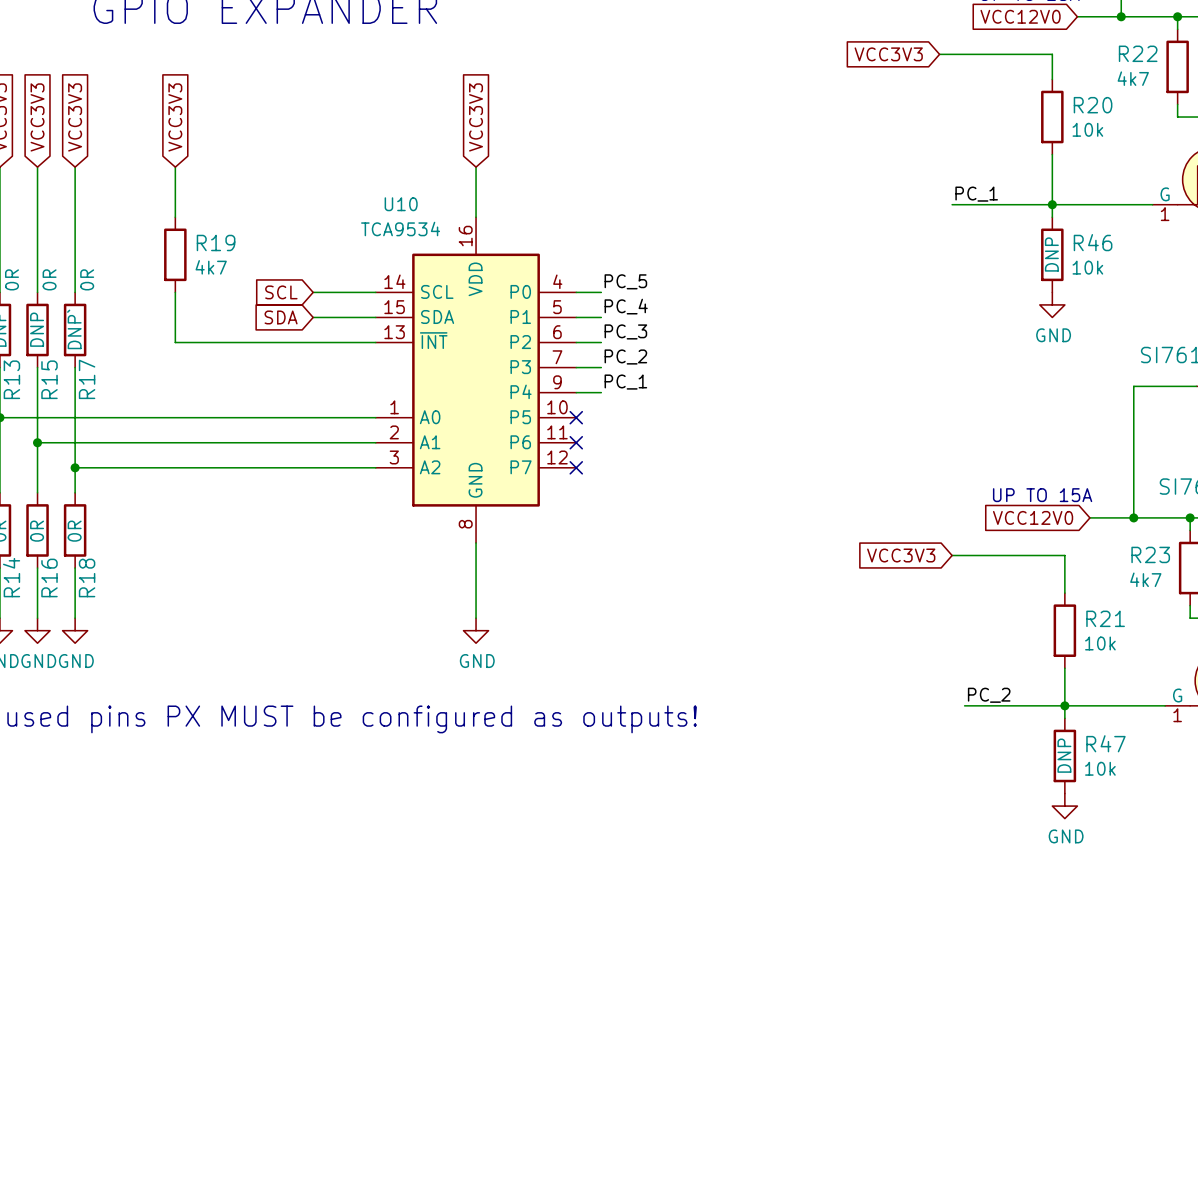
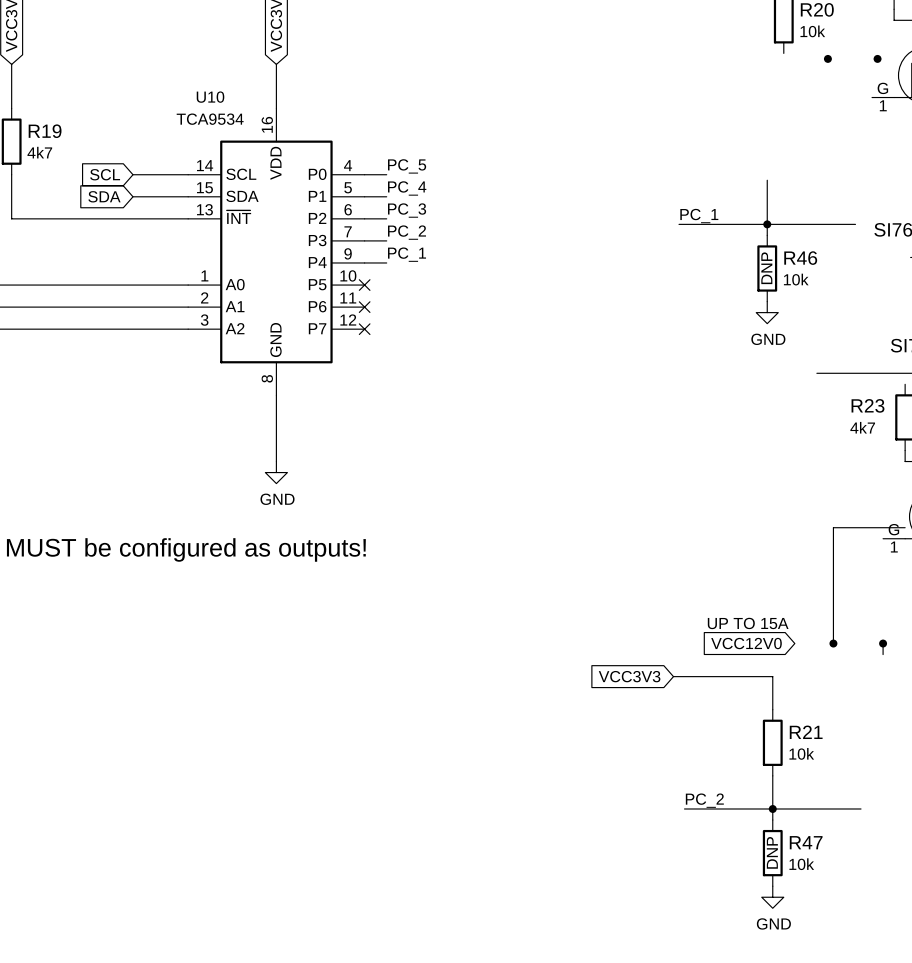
wire: (1052, 154) (1052, 217) -> (767, 180) (767, 235)
junction: none -> (827, 58)
junction: none -> (877, 58)
label position: PC_1 (976, 194) -> PC_1 (699, 216)
wire: (952, 204) (1152, 204) -> (679, 224) (855, 224)
junction: (1052, 204) -> none
R46 position: (1052, 254) -> (767, 268)
power symbol: GND (1052, 304) -> none
junction: none -> (767, 224)
wire: (1196, 386) (1133, 386) (1133, 517) -> none
power symbol: none -> GND (767, 312)
text: UP TO 15A (1042, 495) -> none
global label: VCC12V0 (1033, 517) -> none
junction: (1133, 517) -> none
wire: (1190, 517) (1190, 530) -> none
junction: (1190, 517) -> none
global label: VCC3V3 (901, 555) -> none
wire: (952, 555) (1064, 555) (1064, 593) -> none
R21 position: (1064, 630) -> (772, 742)
wire: (1064, 668) (1064, 718) -> none
wire: none -> (905, 527) (833, 527) (833, 643)
label: PC_2 (989, 695) -> none
wire: (964, 705) (1165, 705) -> none
junction: (1064, 705) -> none
R47 position: (1064, 755) -> (772, 853)
text: none -> UP TO 15A (748, 623)
power symbol: GND (1064, 806) -> none
global label: none -> VCC12V0 (746, 643)
junction: none -> (833, 643)
wire: none -> (883, 643) (883, 654)
junction: none -> (883, 643)
global label: none -> VCC3V3 (629, 676)
wire: none -> (673, 676) (772, 676) (772, 709)
wire: none -> (772, 775) (772, 820)
label: none -> PC_2 (704, 800)
wire: none -> (684, 808) (861, 808)
junction: none -> (772, 808)
power symbol: none -> GND (772, 897)

